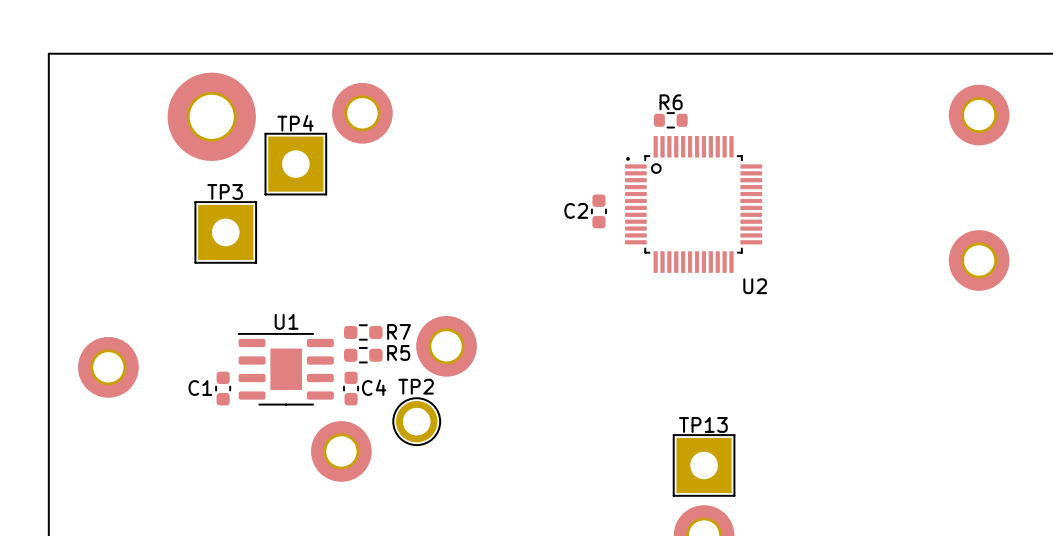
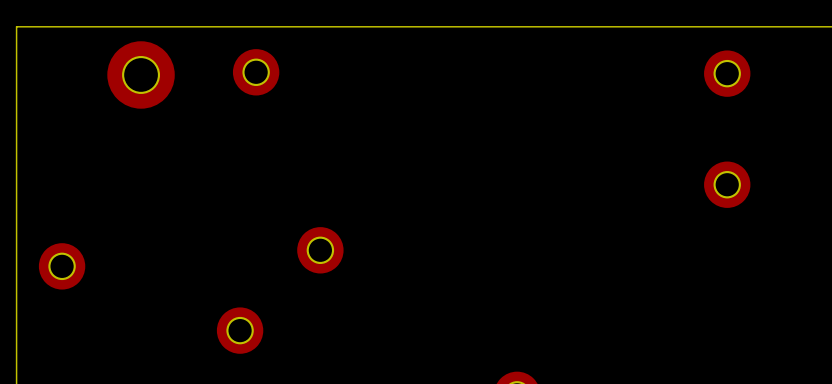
R6: (670, 120) -> none
TP4: (295, 164) -> none
U2: (693, 204) -> none
C2: (598, 211) -> none
TP3: (225, 232) -> none
R7: (363, 332) -> none
R5: (363, 355) -> none
U1: (285, 369) -> none
C1: (223, 388) -> none
C4: (351, 388) -> none
TP2: (416, 421) -> none
TP13: (704, 465) -> none

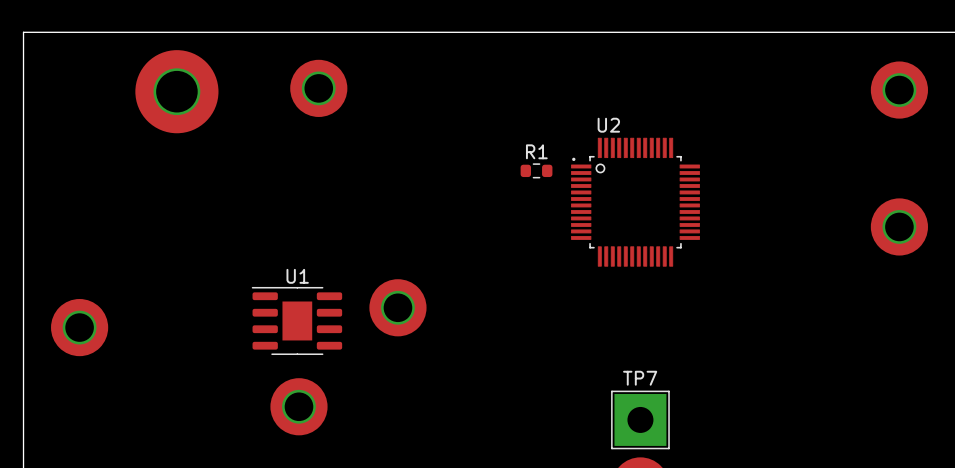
R1: none -> (536, 170)
U2: none -> (635, 202)
U1: none -> (296, 320)
TP7: none -> (640, 419)

